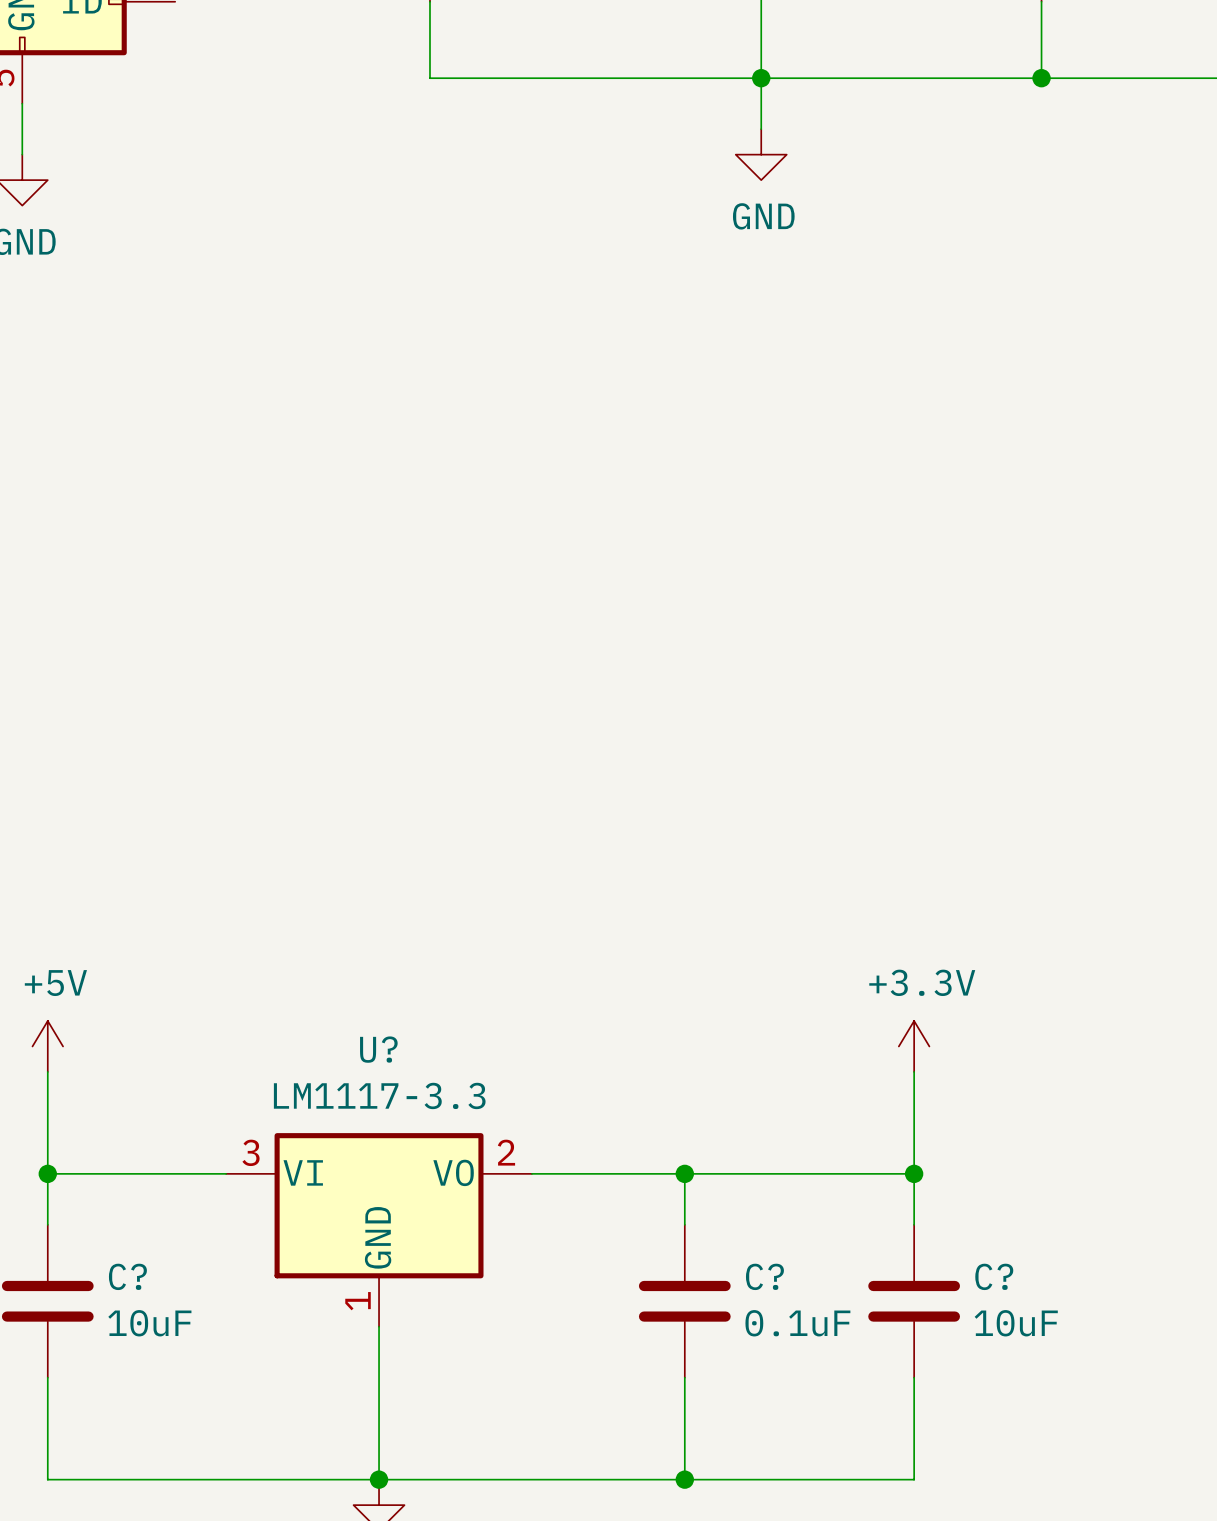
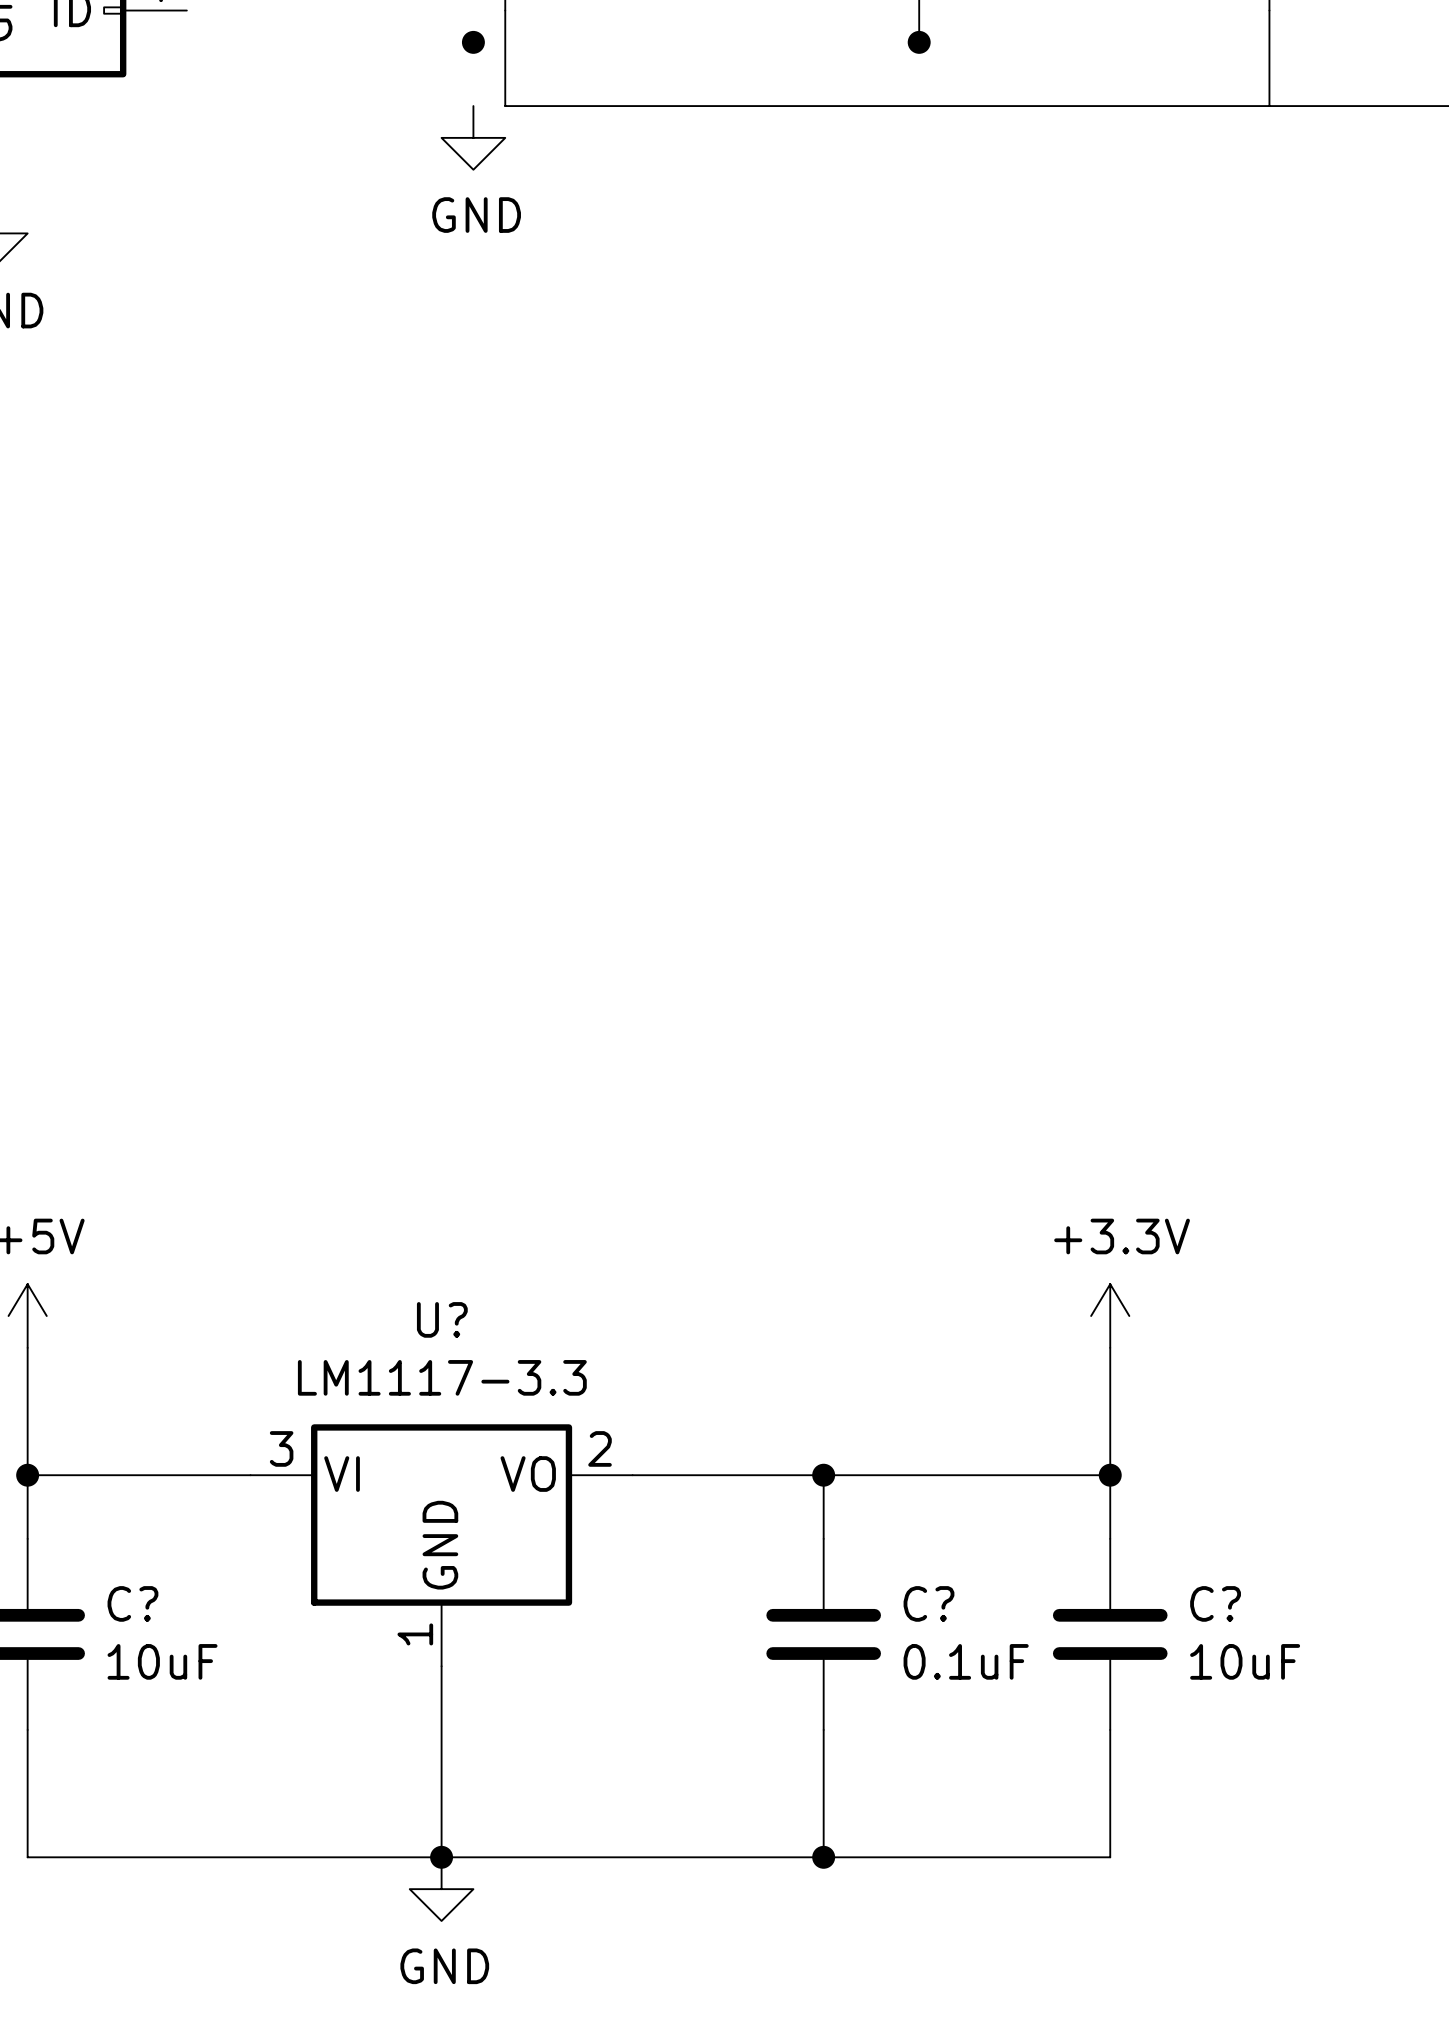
junction: none -> (473, 42)
wire: (761, 27) (761, 129) -> none
junction position: (761, 78) -> (919, 42)
junction: (1041, 78) -> none
power symbol position: GND (761, 154) -> GND (473, 137)

